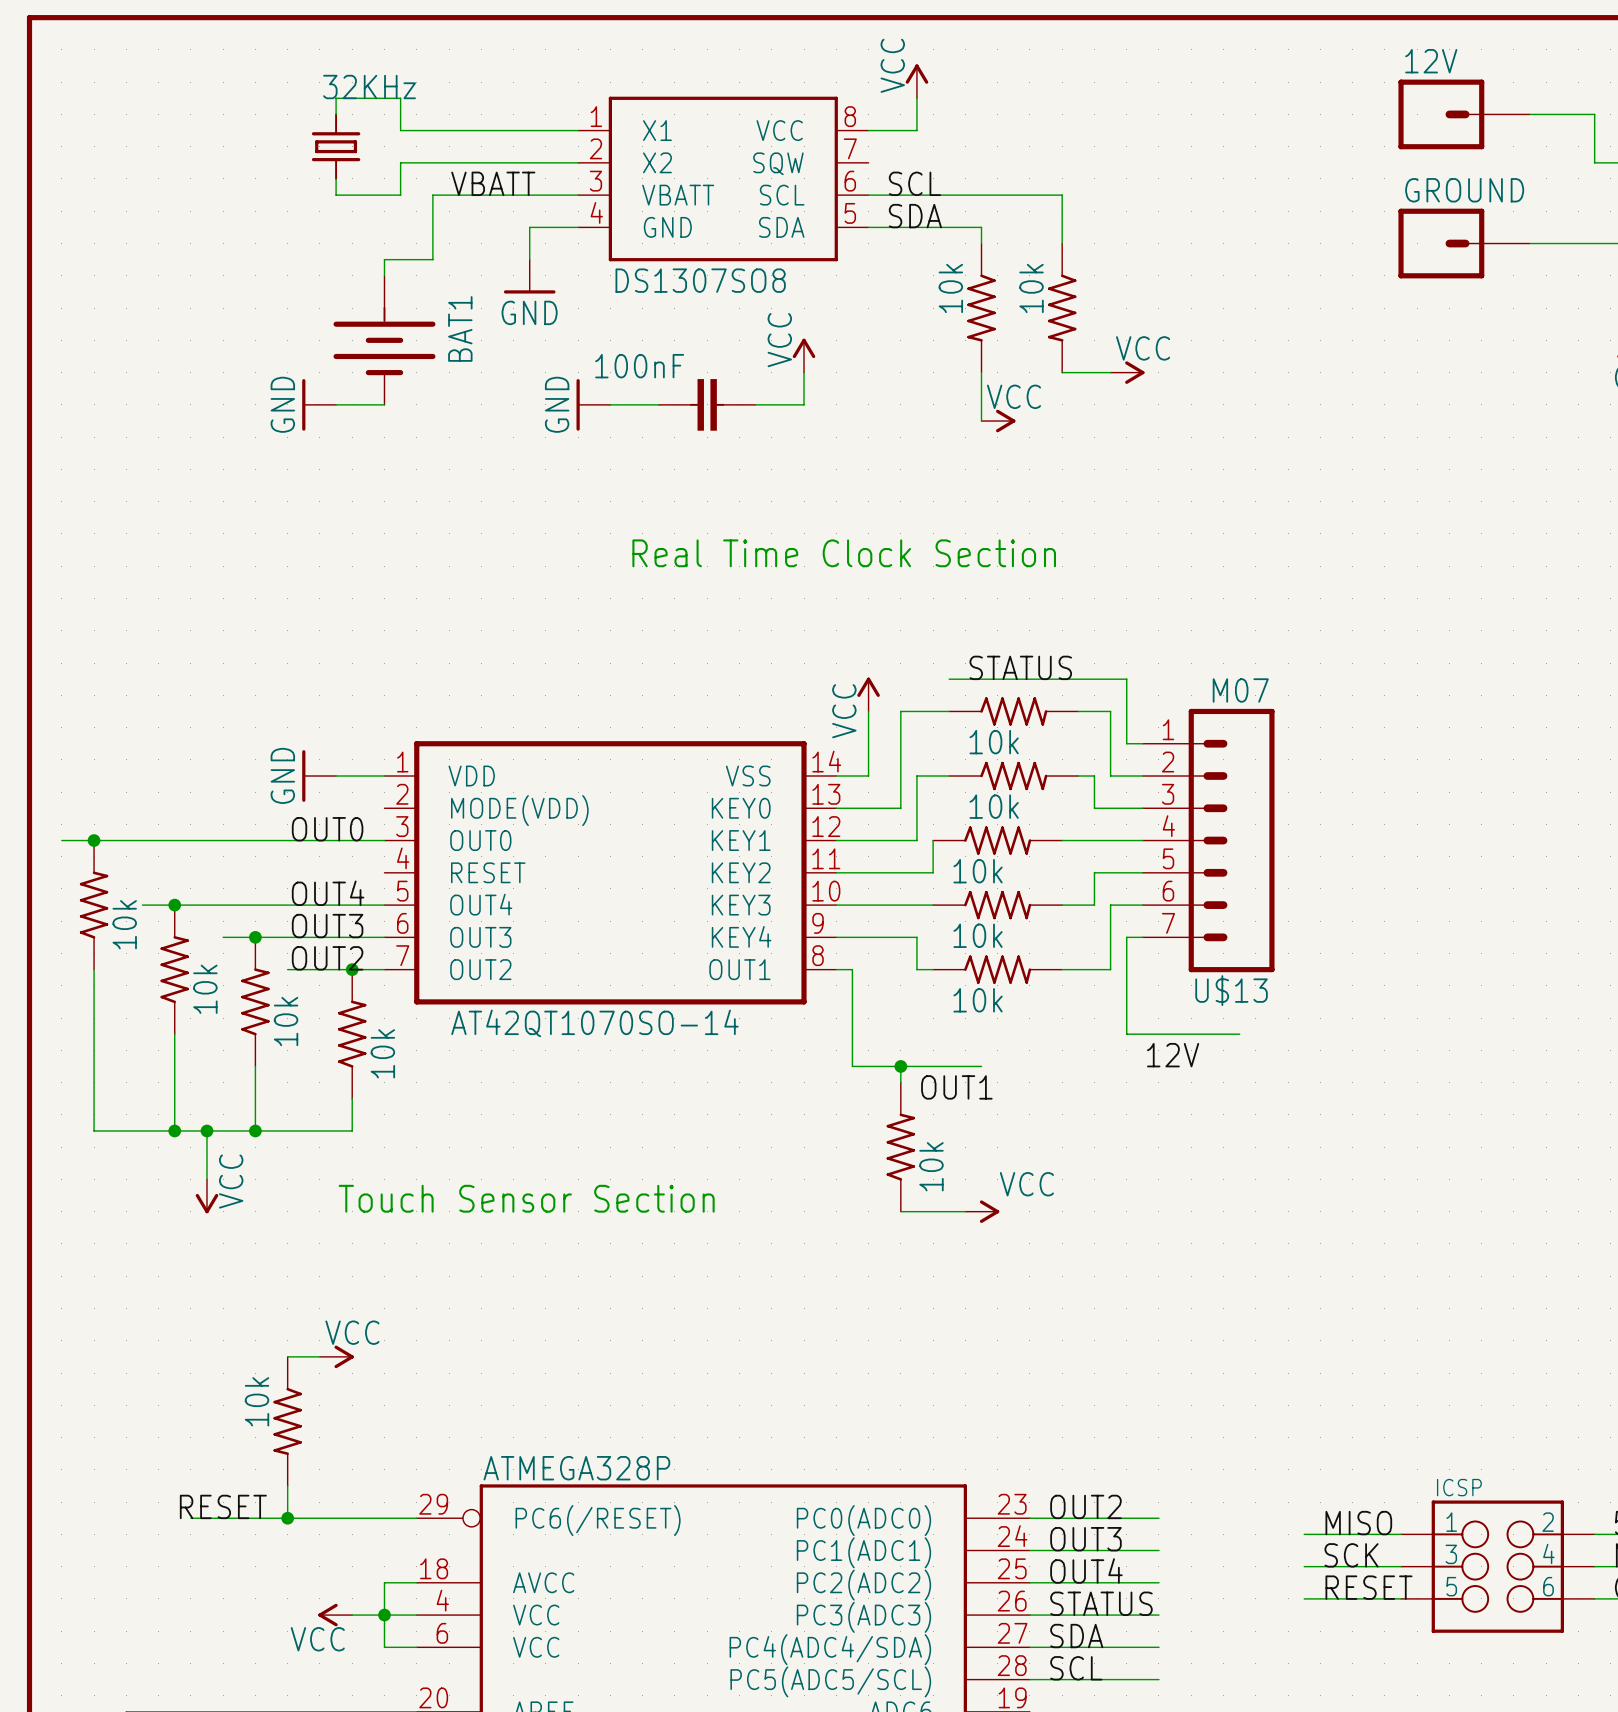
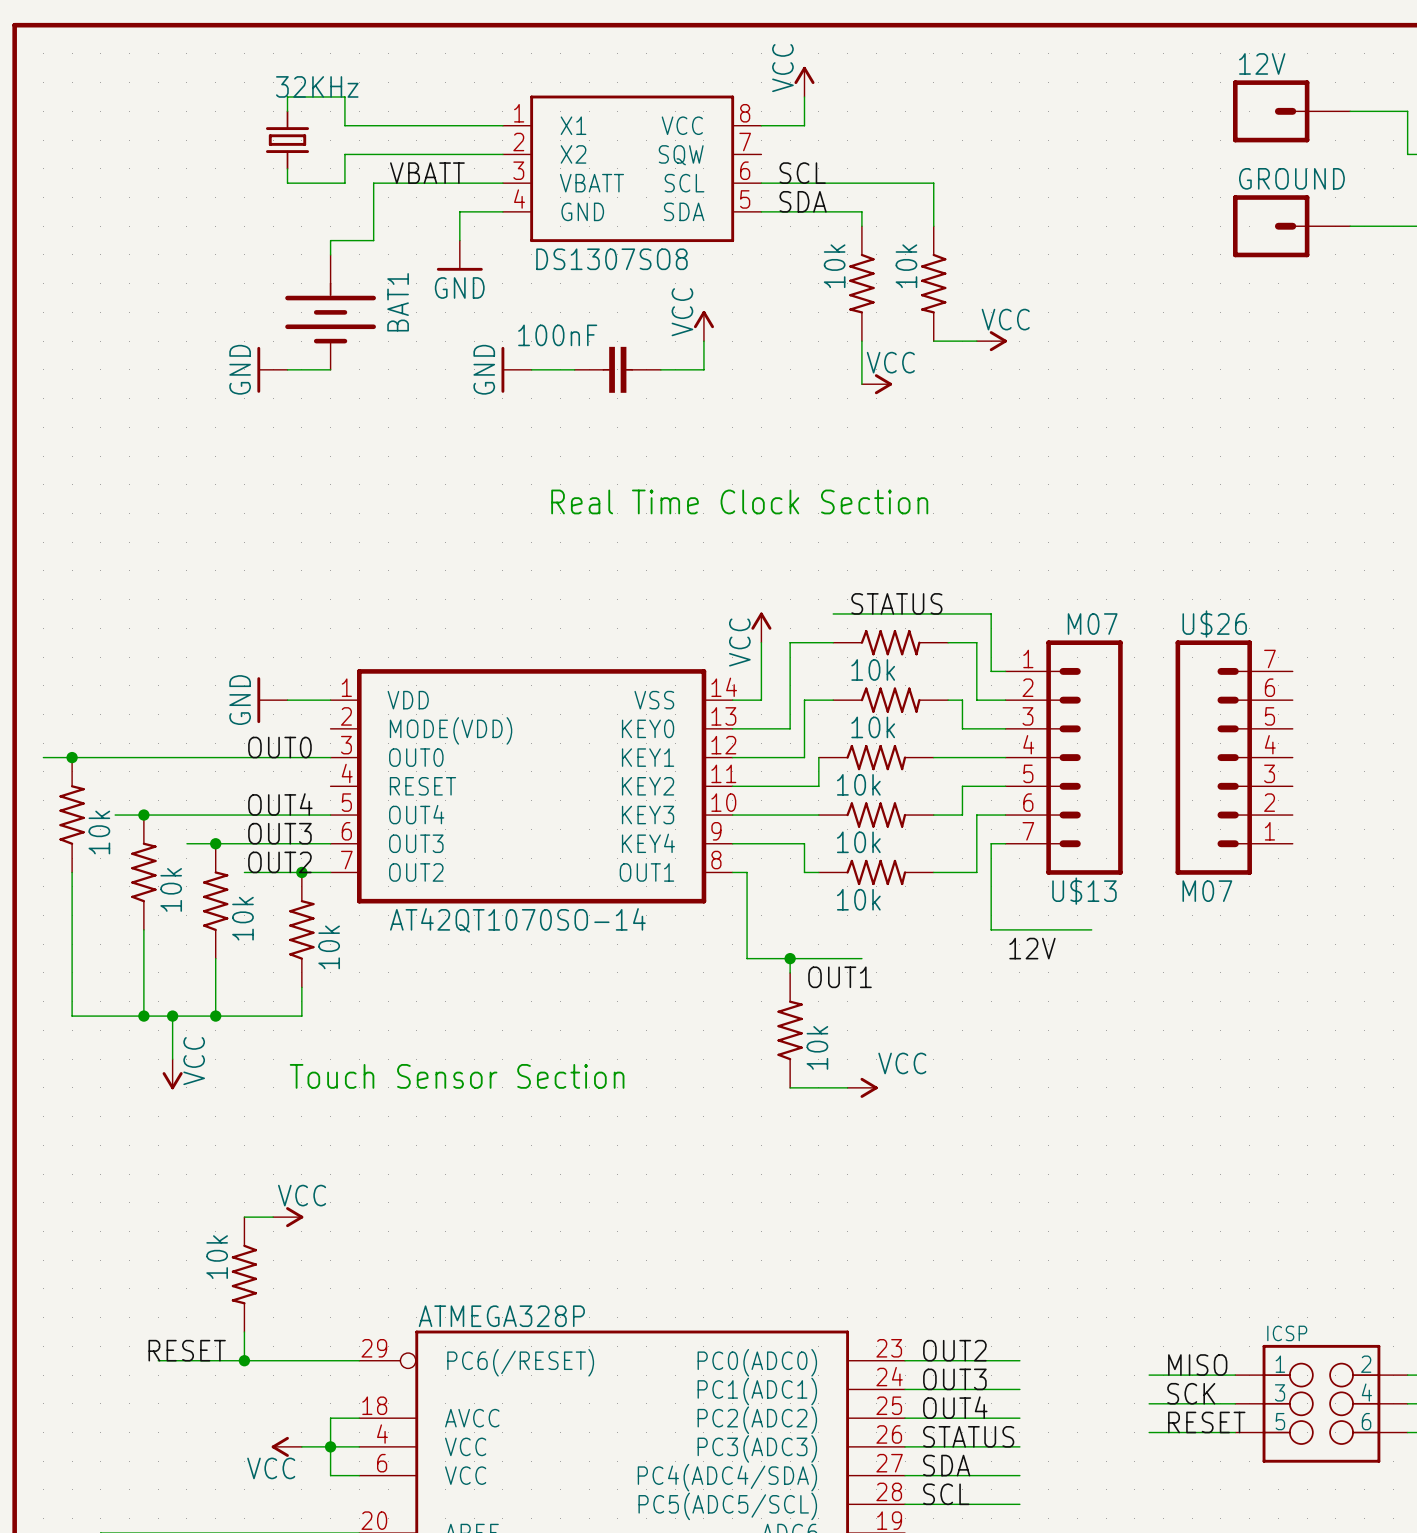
U$26: none -> M07 (1234, 757)

